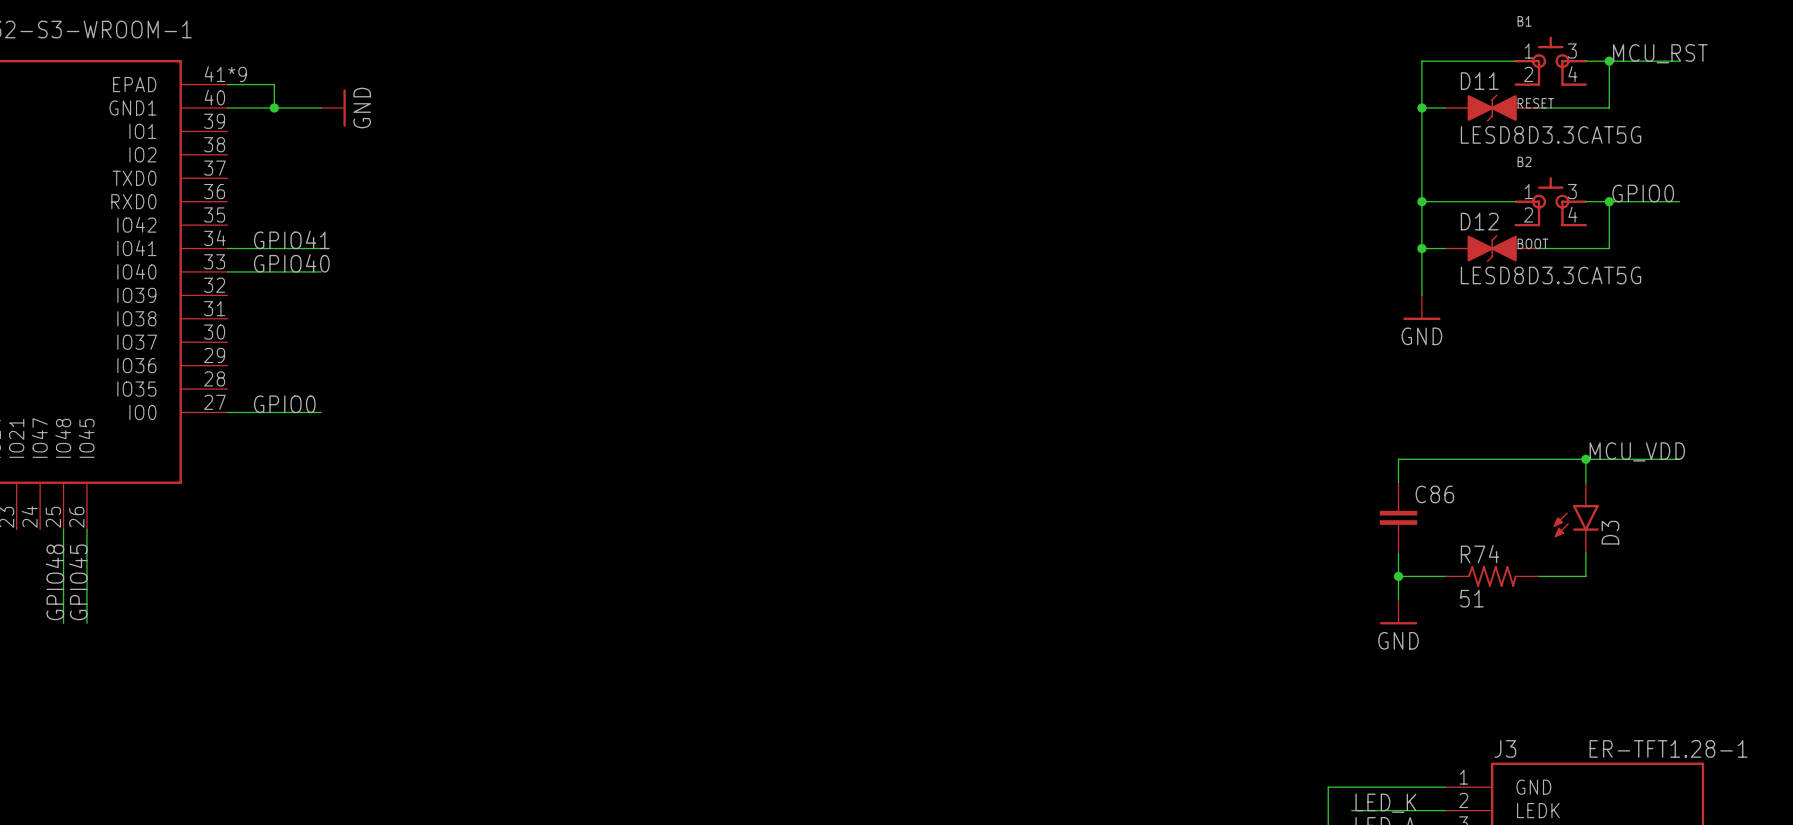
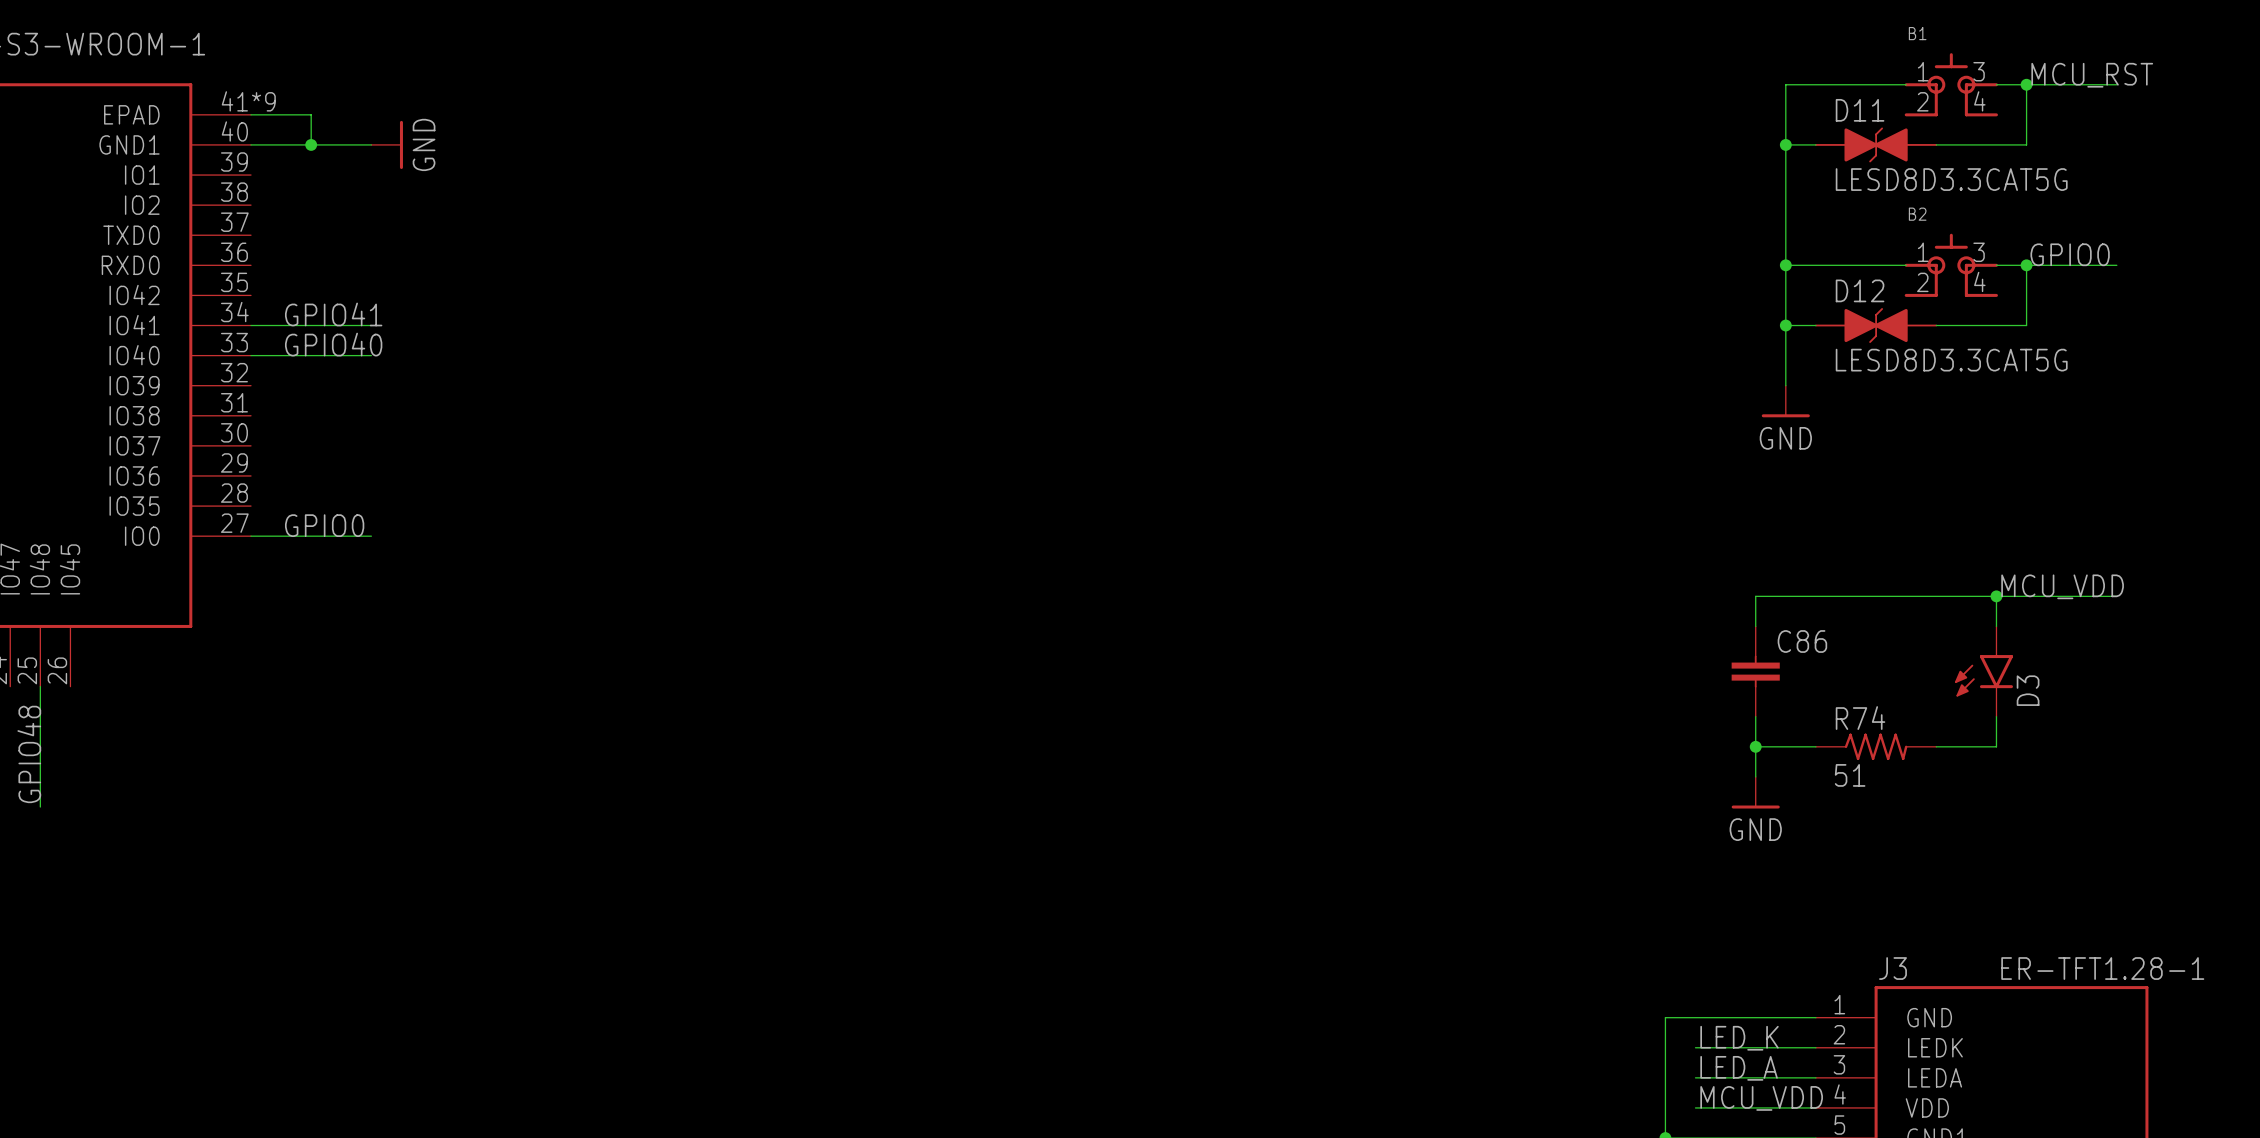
B1 value: RESET (1535, 103) -> none
B2 value: BOOT (1532, 243) -> none
wire: (86, 529) (86, 623) -> none
label: GPIO45 (78, 582) -> none

